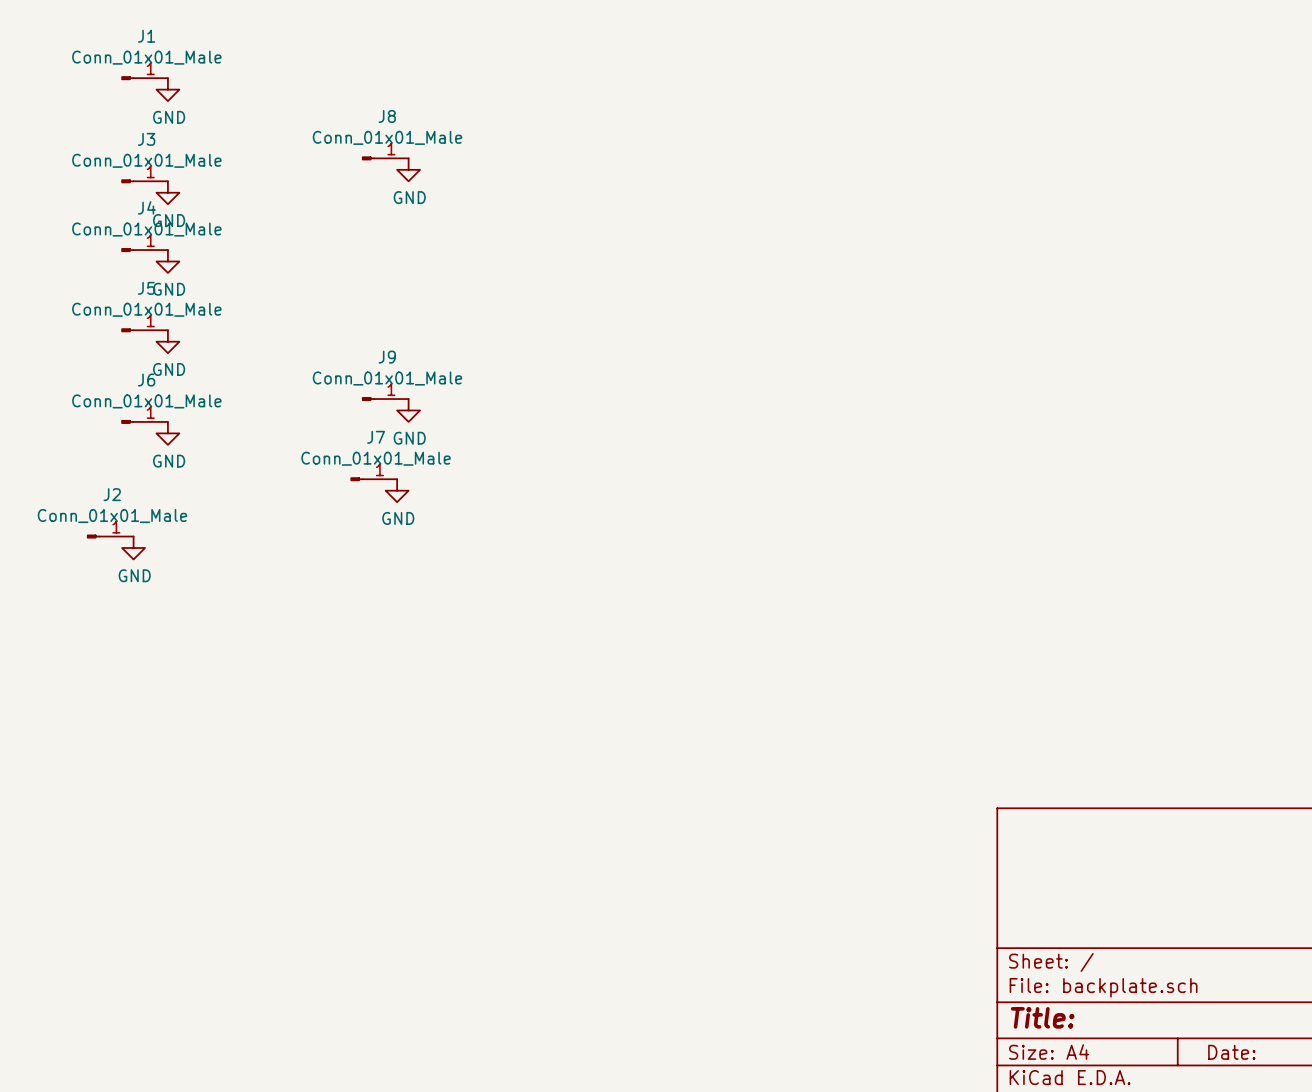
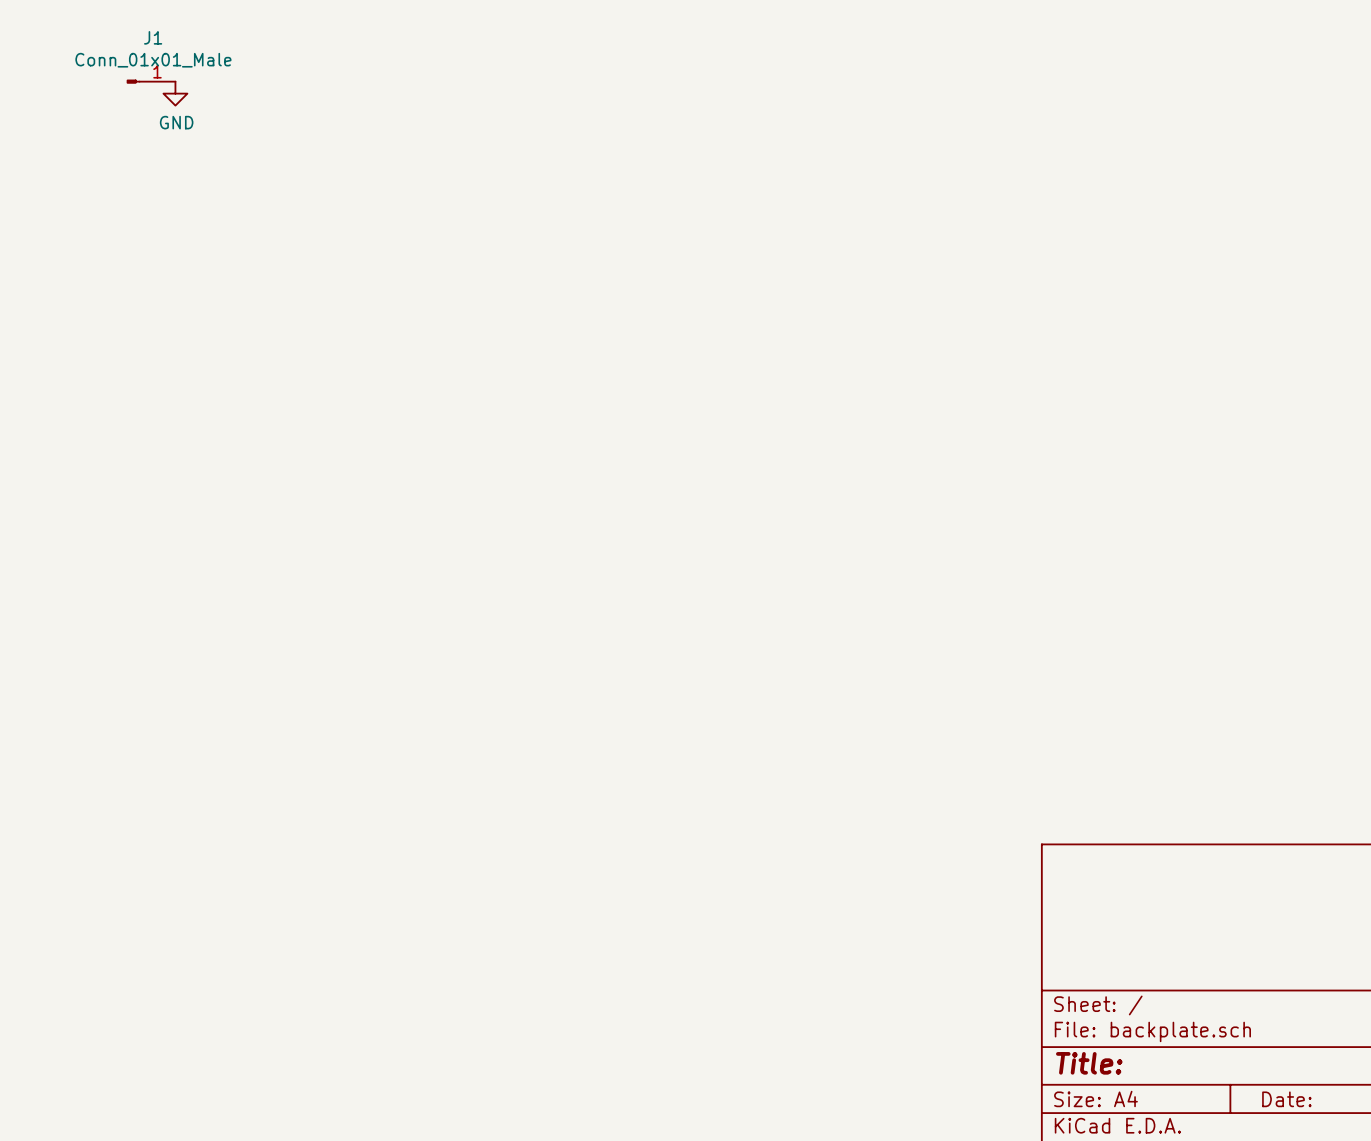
J8: Conn_01x01_Male (385, 158) -> none
power symbol: GND (408, 169) -> none
J3: Conn_01x01_Male (144, 181) -> none
power symbol: GND (167, 192) -> none
J4: Conn_01x01_Male (144, 250) -> none
power symbol: GND (167, 261) -> none
J5: Conn_01x01_Male (144, 330) -> none
power symbol: GND (167, 341) -> none
J9: Conn_01x01_Male (385, 399) -> none
power symbol: GND (408, 410) -> none
J6: Conn_01x01_Male (144, 421) -> none
power symbol: GND (167, 433) -> none
J7: Conn_01x01_Male (373, 479) -> none
power symbol: GND (397, 490) -> none
J2: Conn_01x01_Male (110, 536) -> none
power symbol: GND (133, 547) -> none

